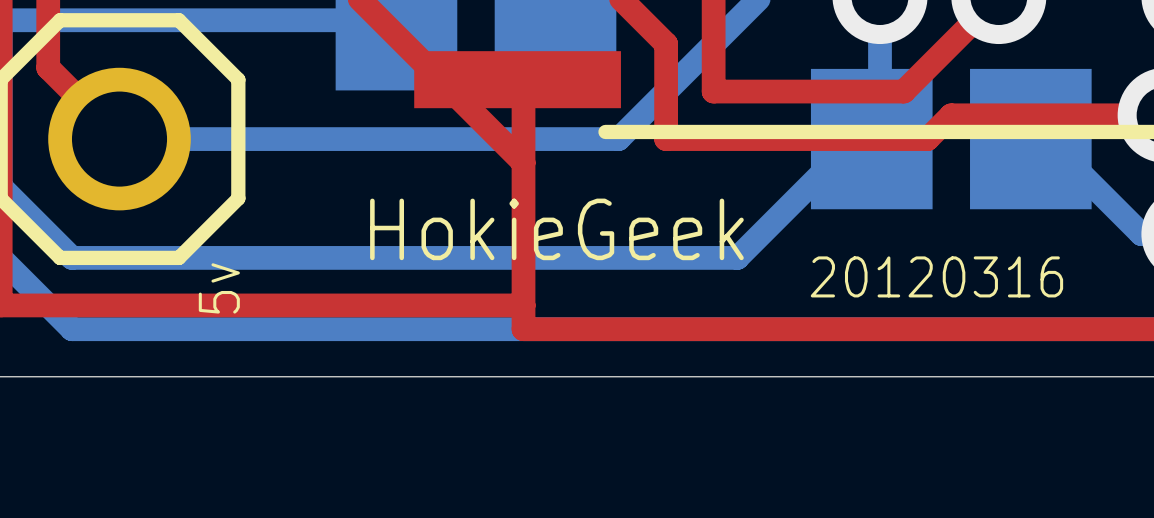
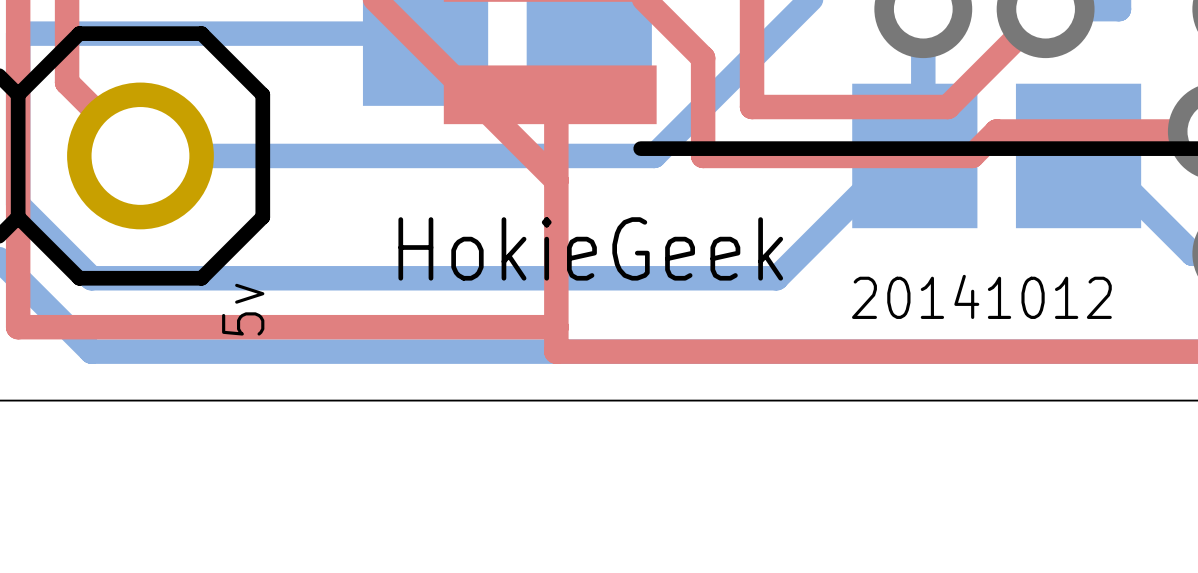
text: 20120316 (936, 276) -> 20141012 (981, 296)

